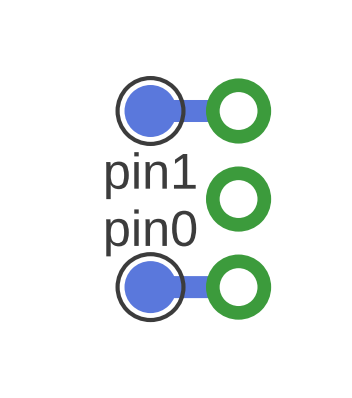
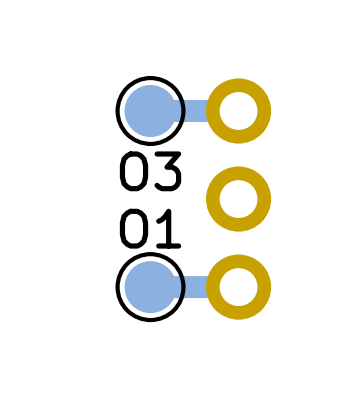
O3 name: none -> O3 (150, 171)
text: pin1 (150, 175) -> none
O1 name: none -> O1 (150, 228)
text: pin0 (151, 232) -> none

